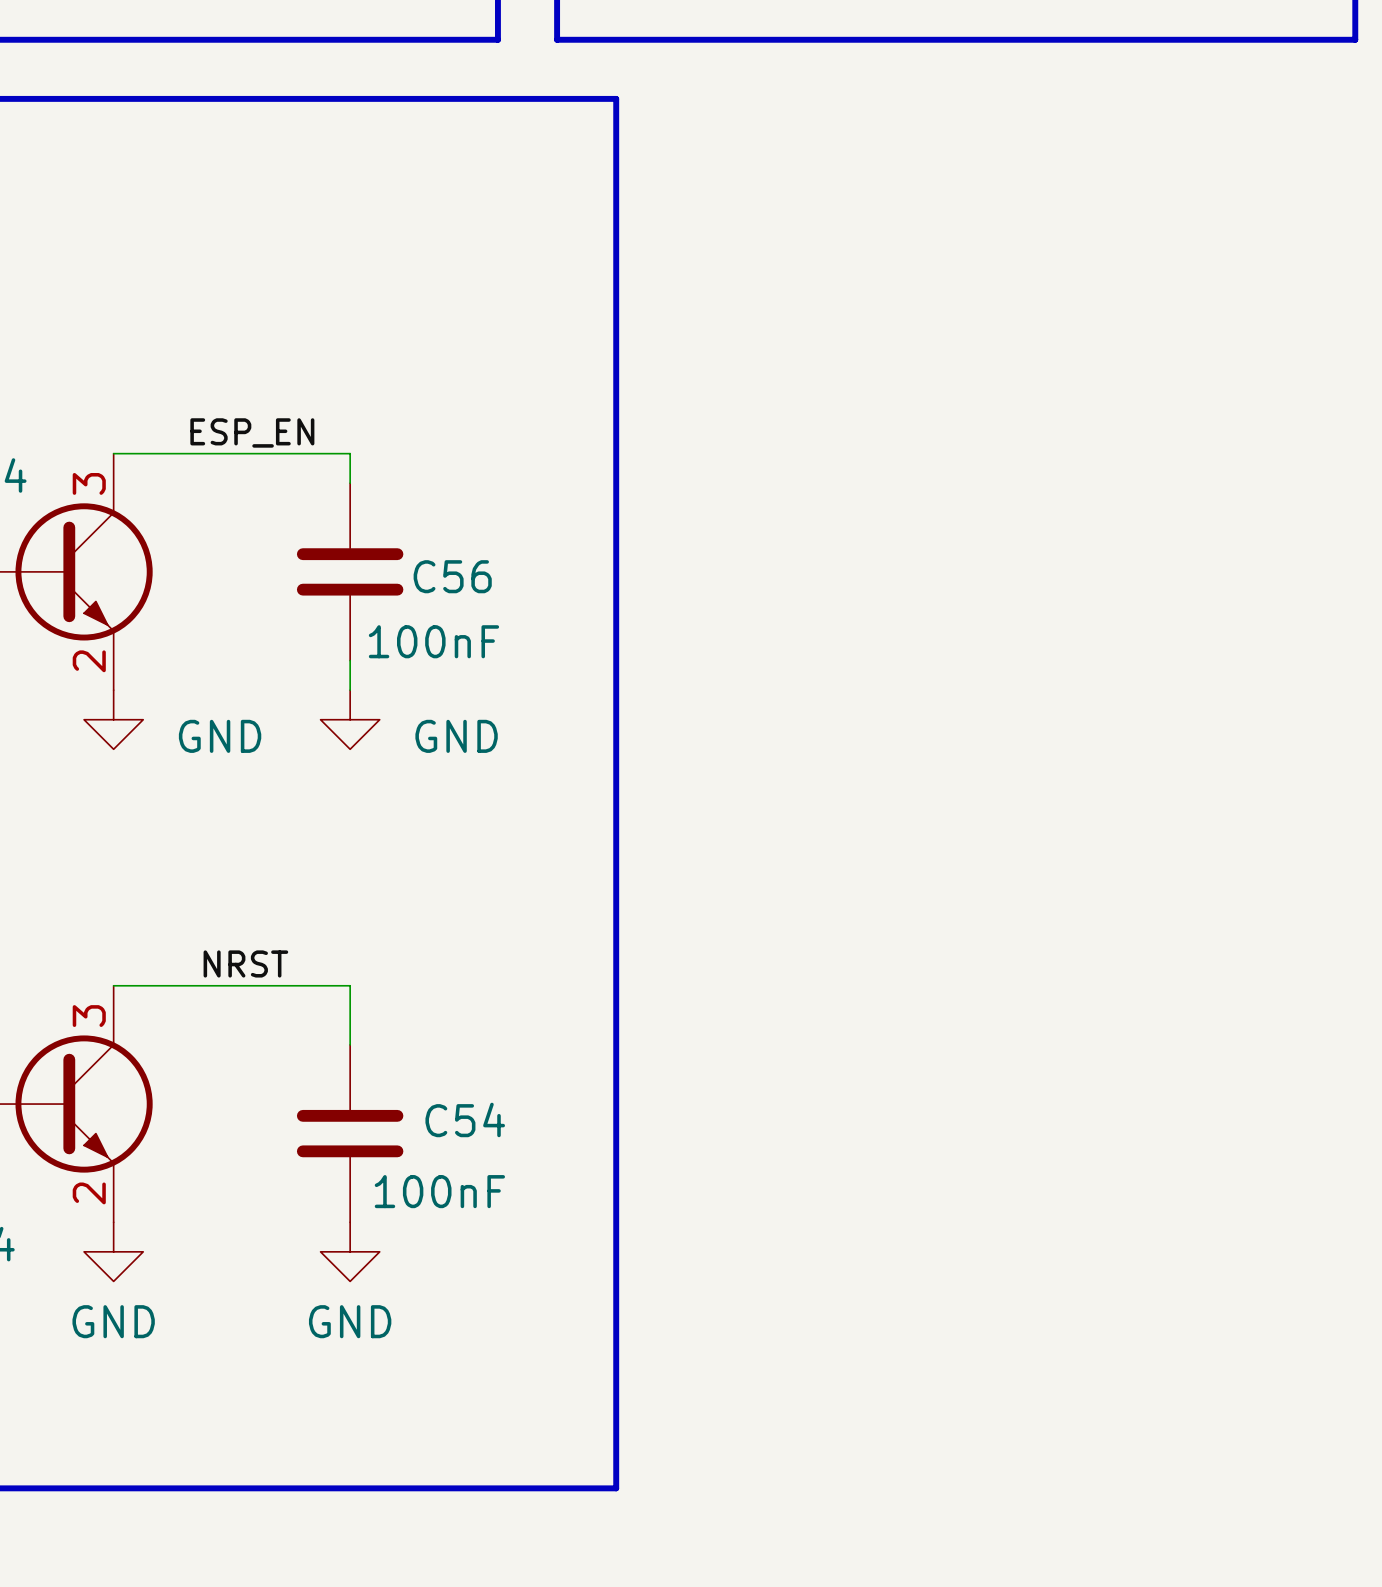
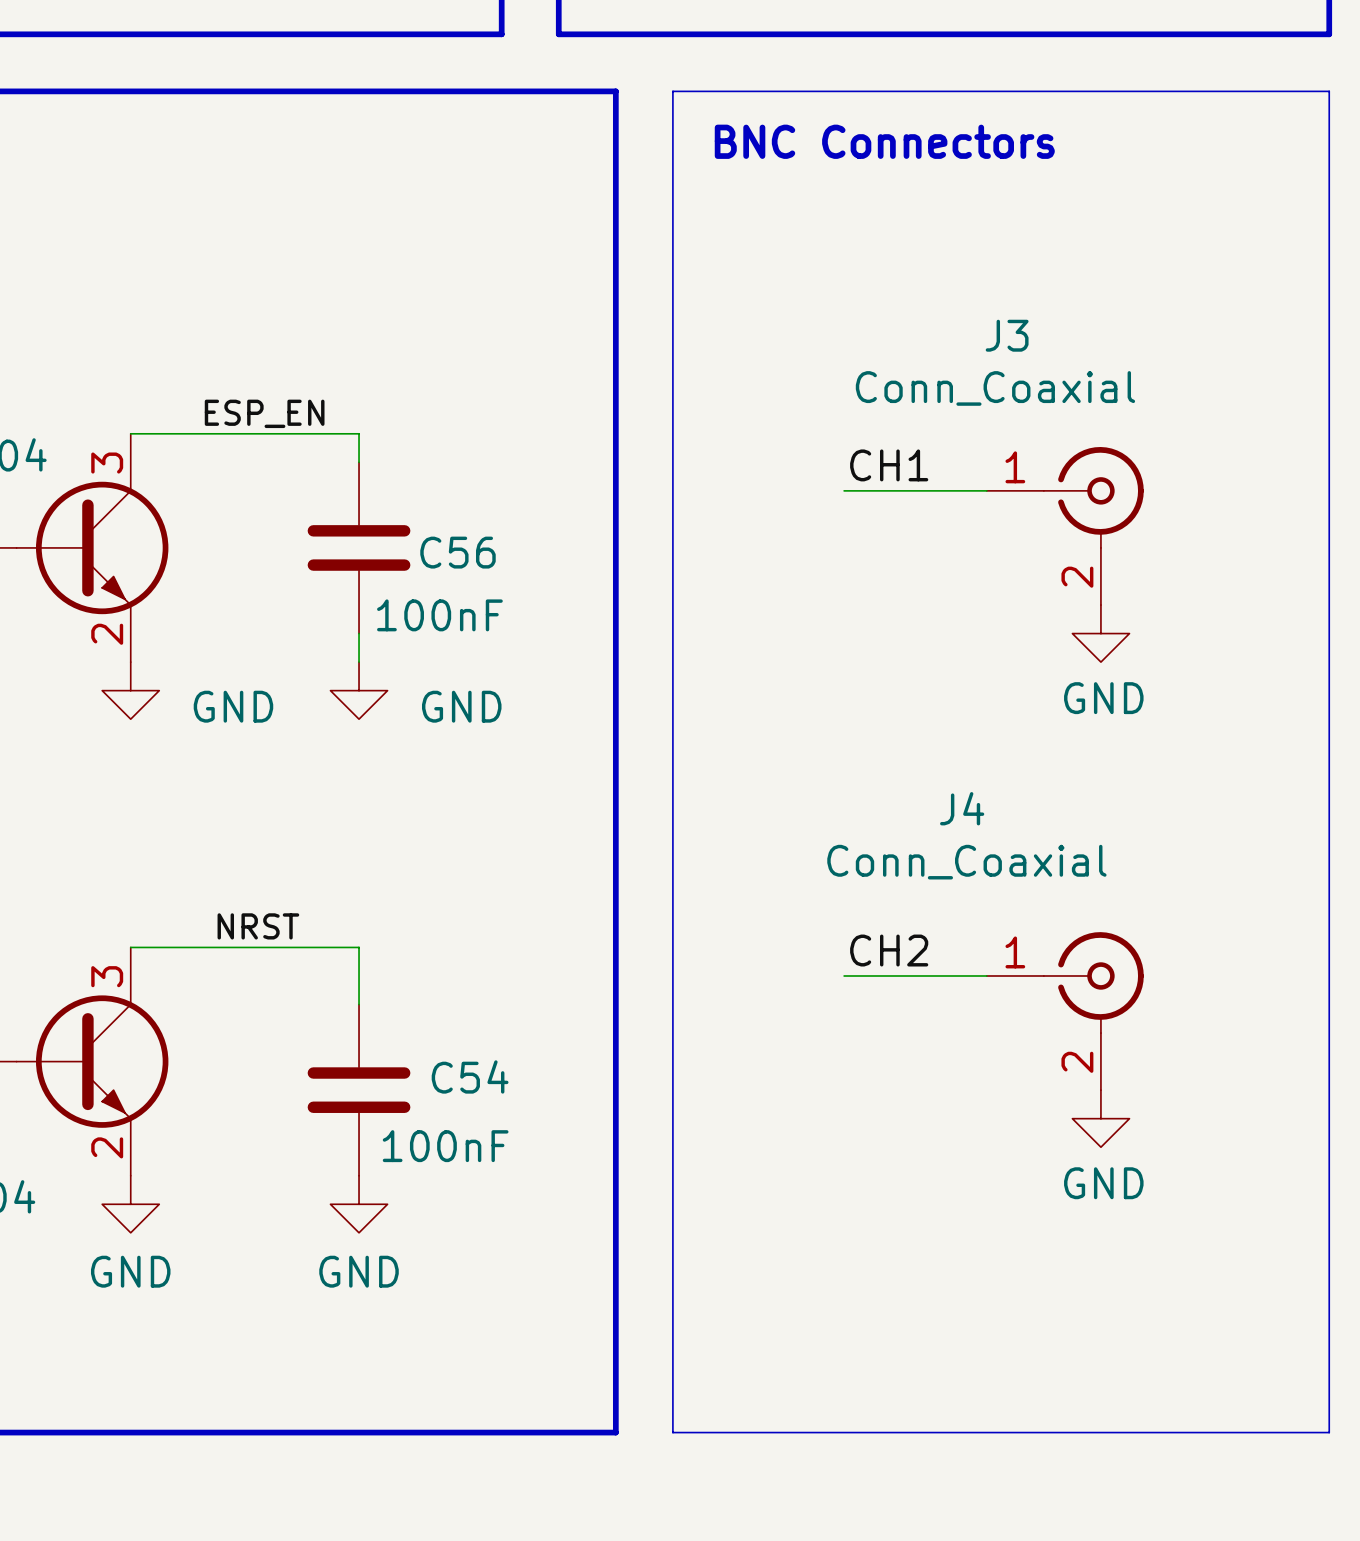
line: none -> (672, 91) (1329, 91) (1329, 1432) (672, 1432) (672, 91)
text: none -> BNC Connectors (884, 141)
label: none -> CH1 (889, 465)
wire: none -> (844, 490) (986, 490)
J3: none -> Conn_Coaxial (1065, 526)
power symbol: none -> GND (1100, 633)
label: none -> CH2 (889, 950)
wire: none -> (844, 975) (986, 975)
J4: none -> Conn_Coaxial (1065, 1011)
power symbol: none -> GND (1100, 1118)

